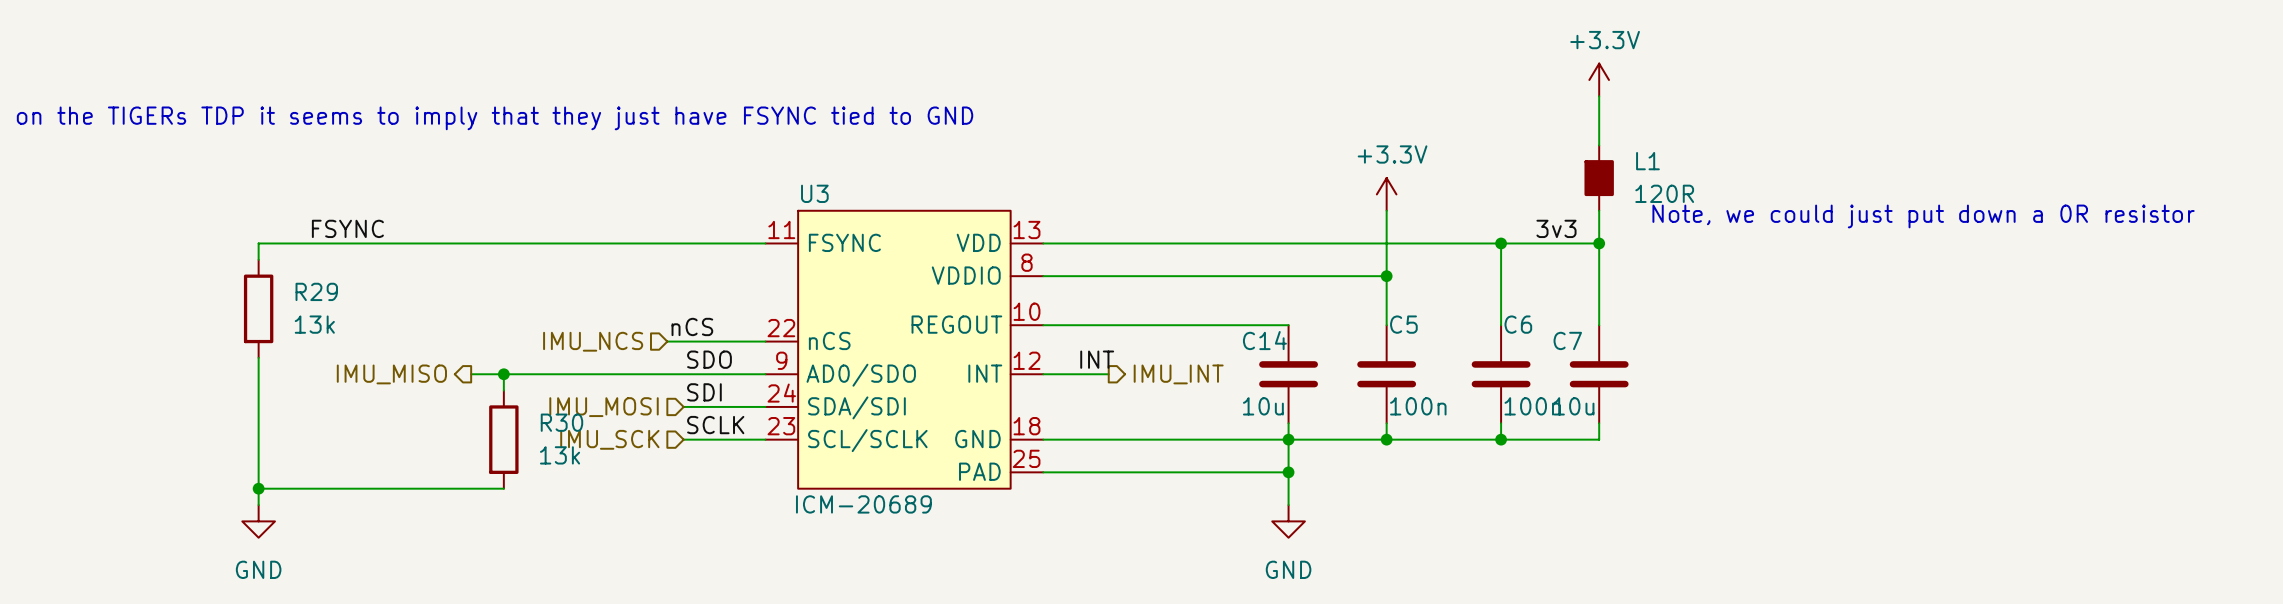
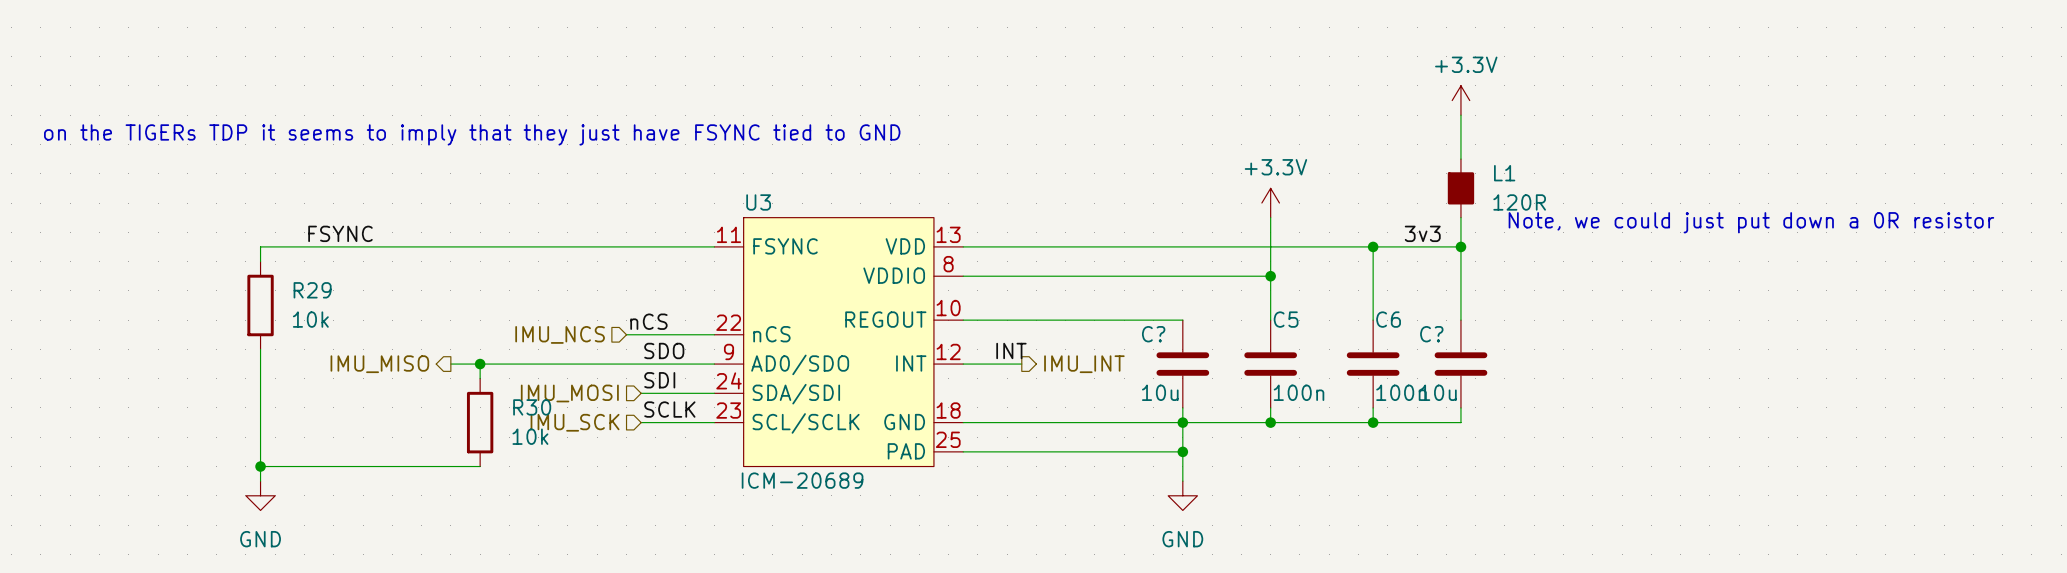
R29 value: 13k (314, 324) -> 10k (310, 319)
C14 name: C14 (1264, 340) -> C? (1153, 334)
C7 name: C7 (1567, 340) -> C? (1431, 334)
R30 value: 13k (560, 455) -> 10k (530, 436)

